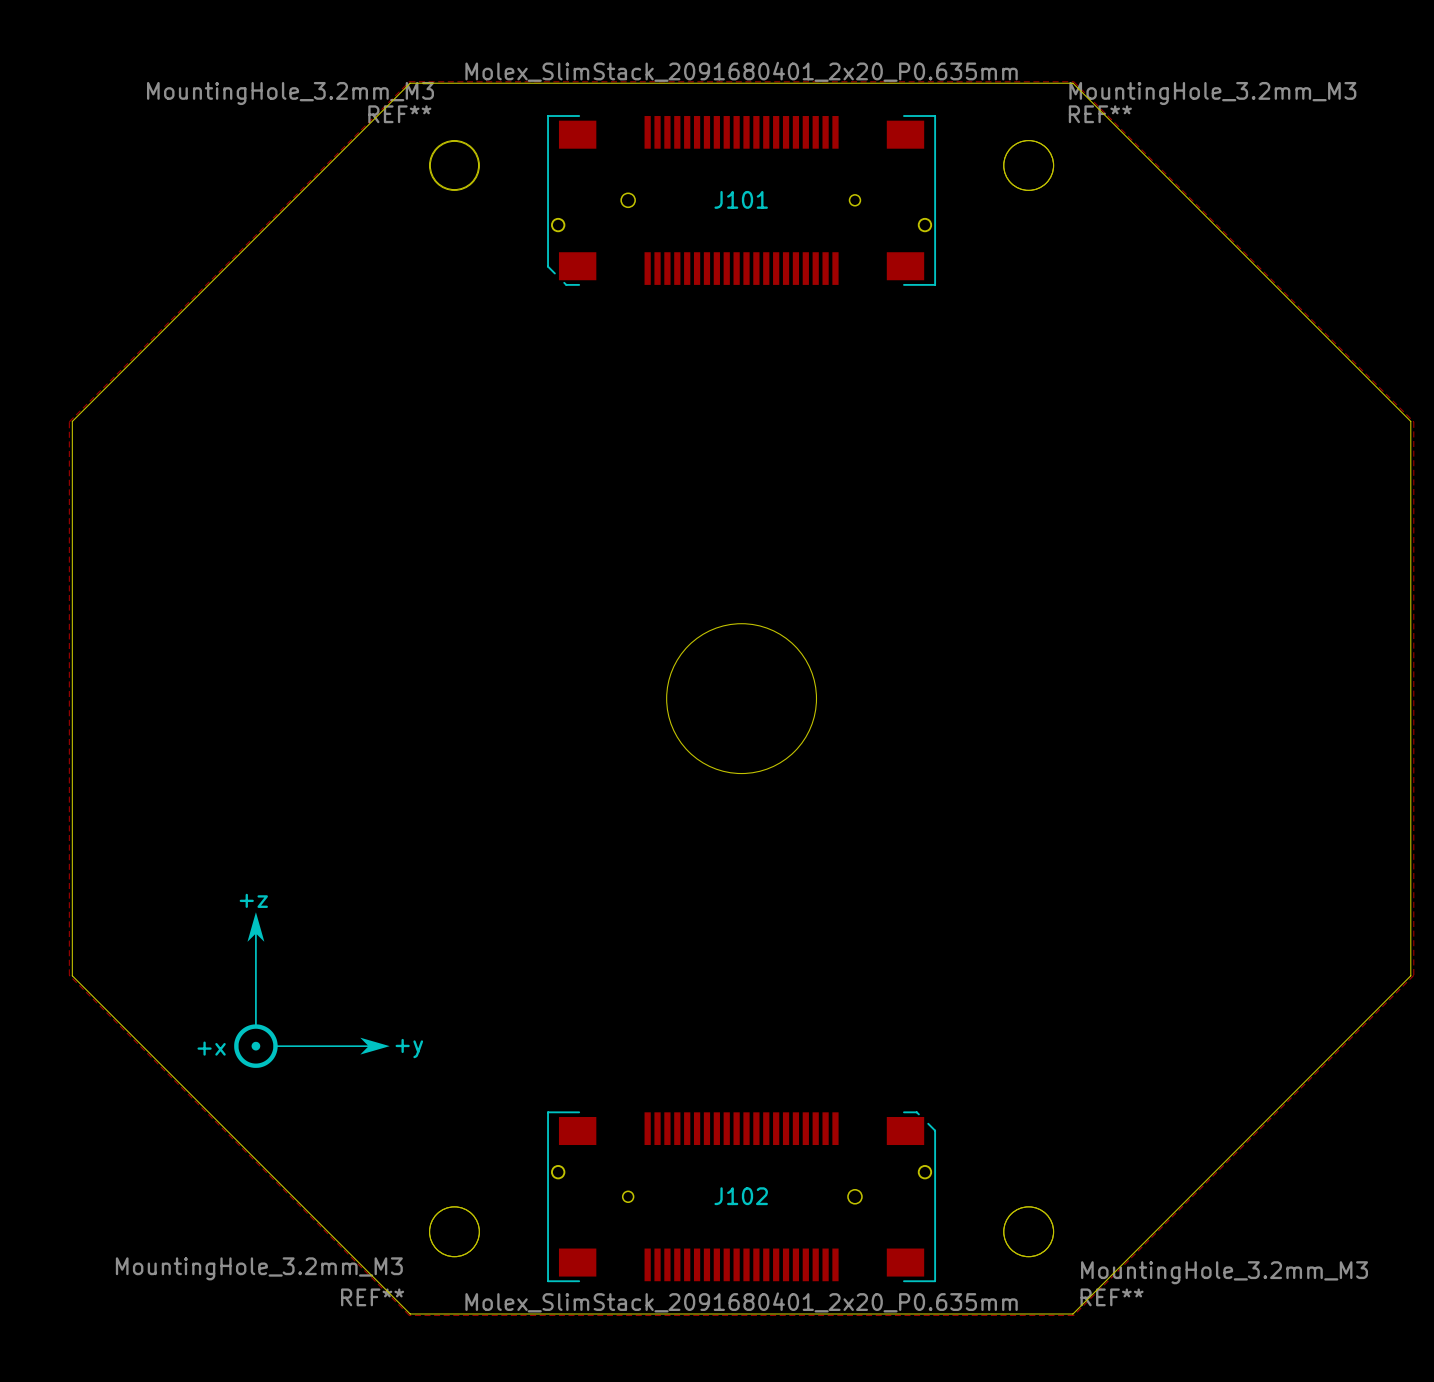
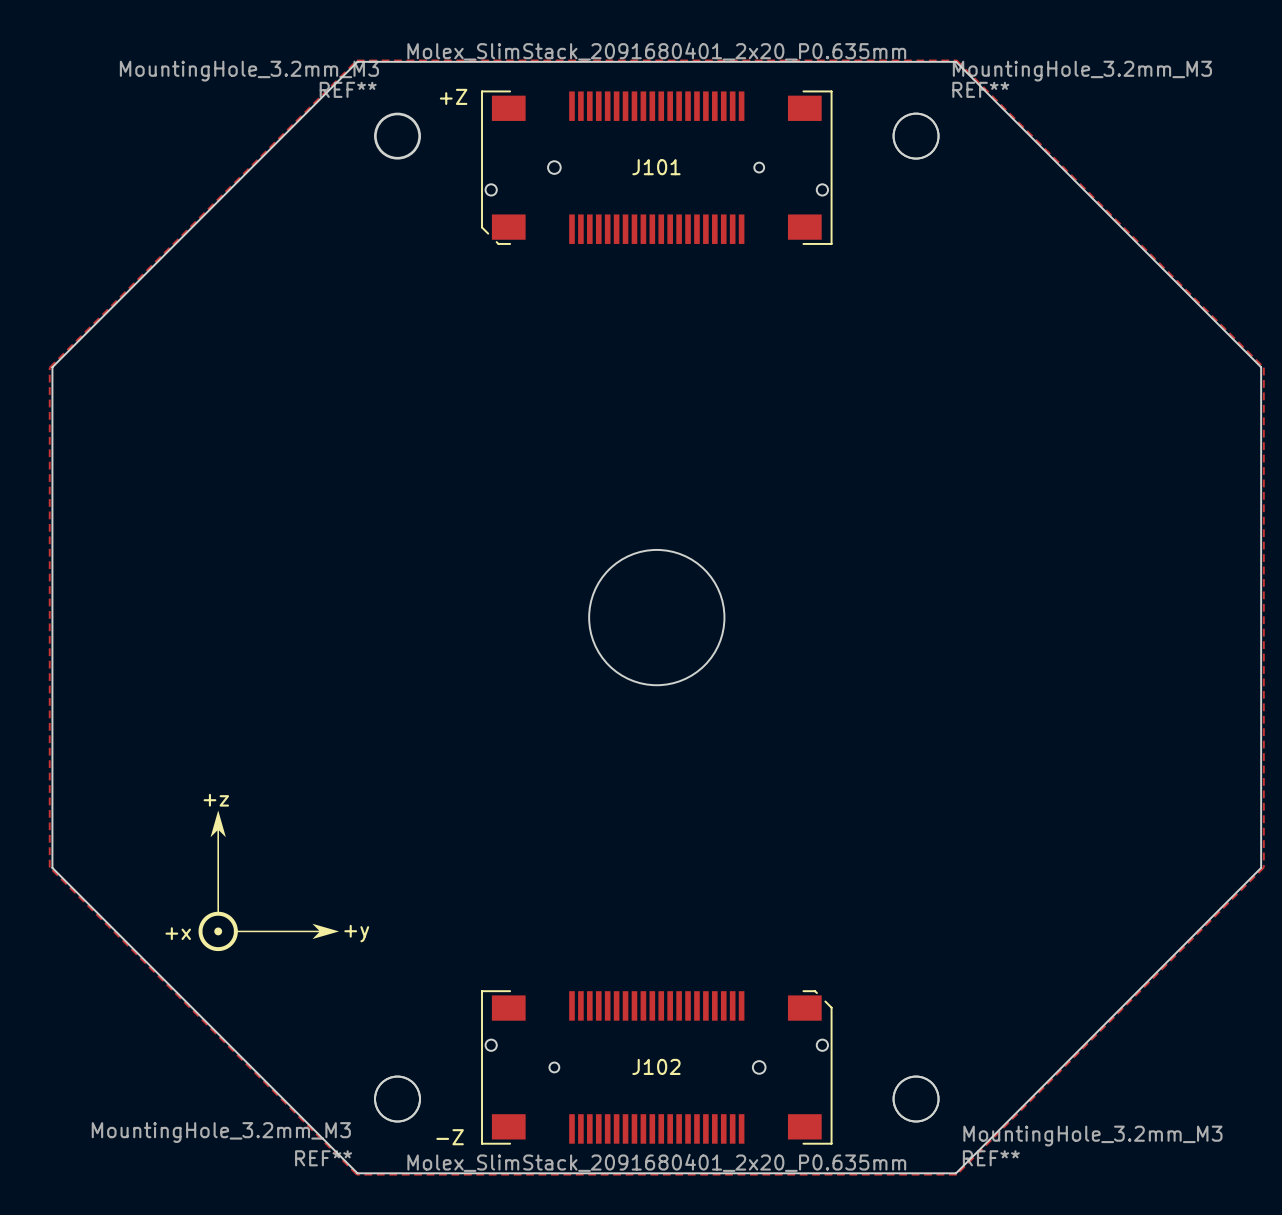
text: none -> +Z (453, 96)
text: none -> -Z (450, 1137)

